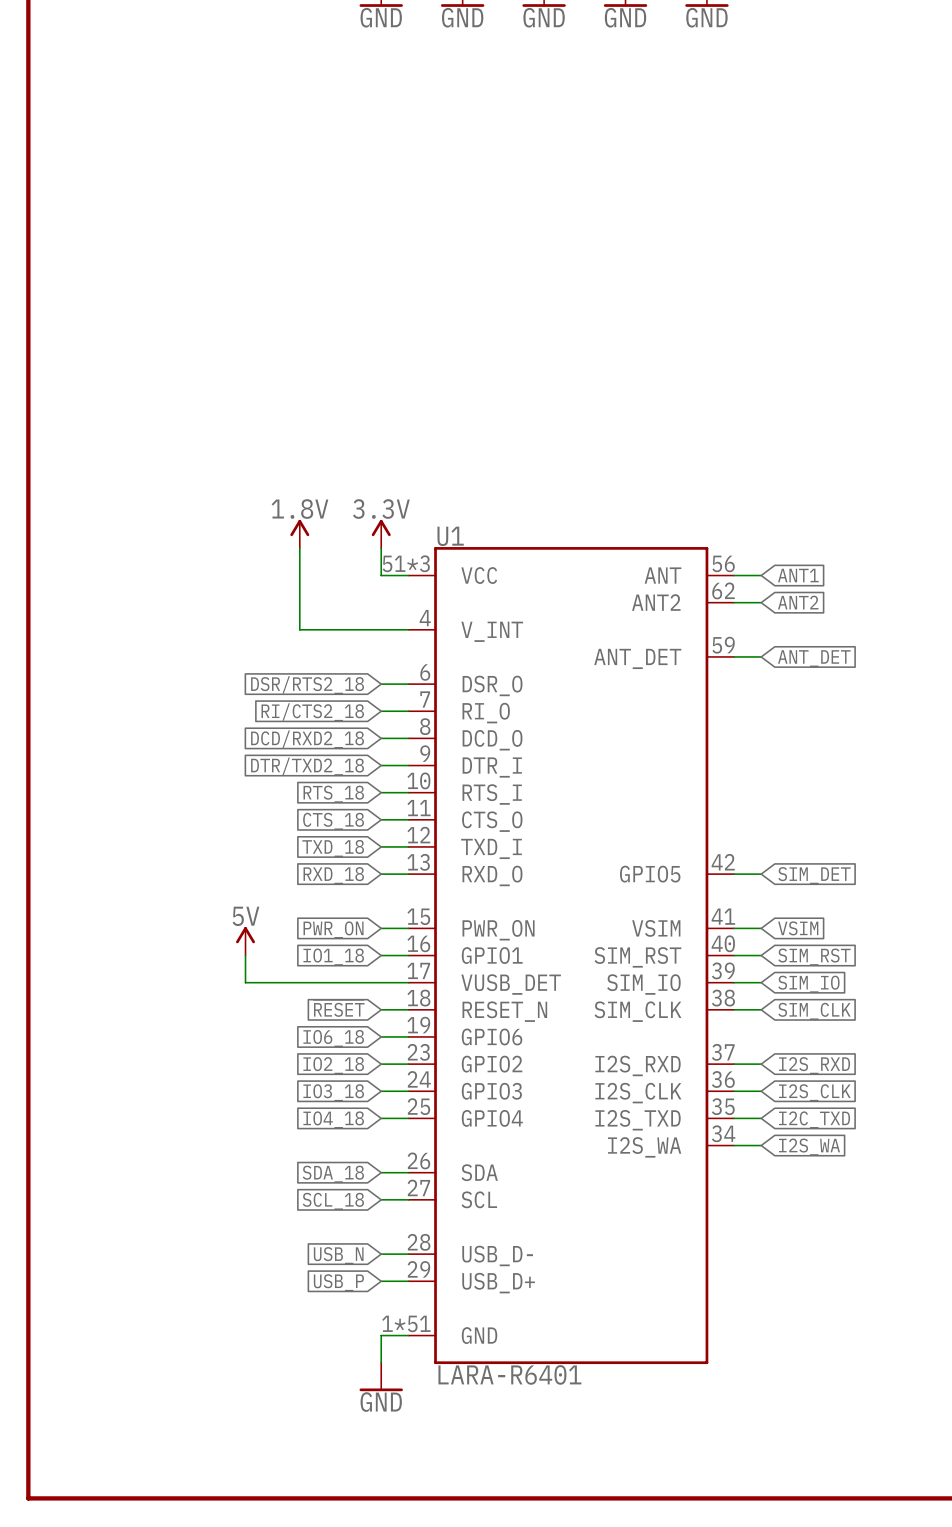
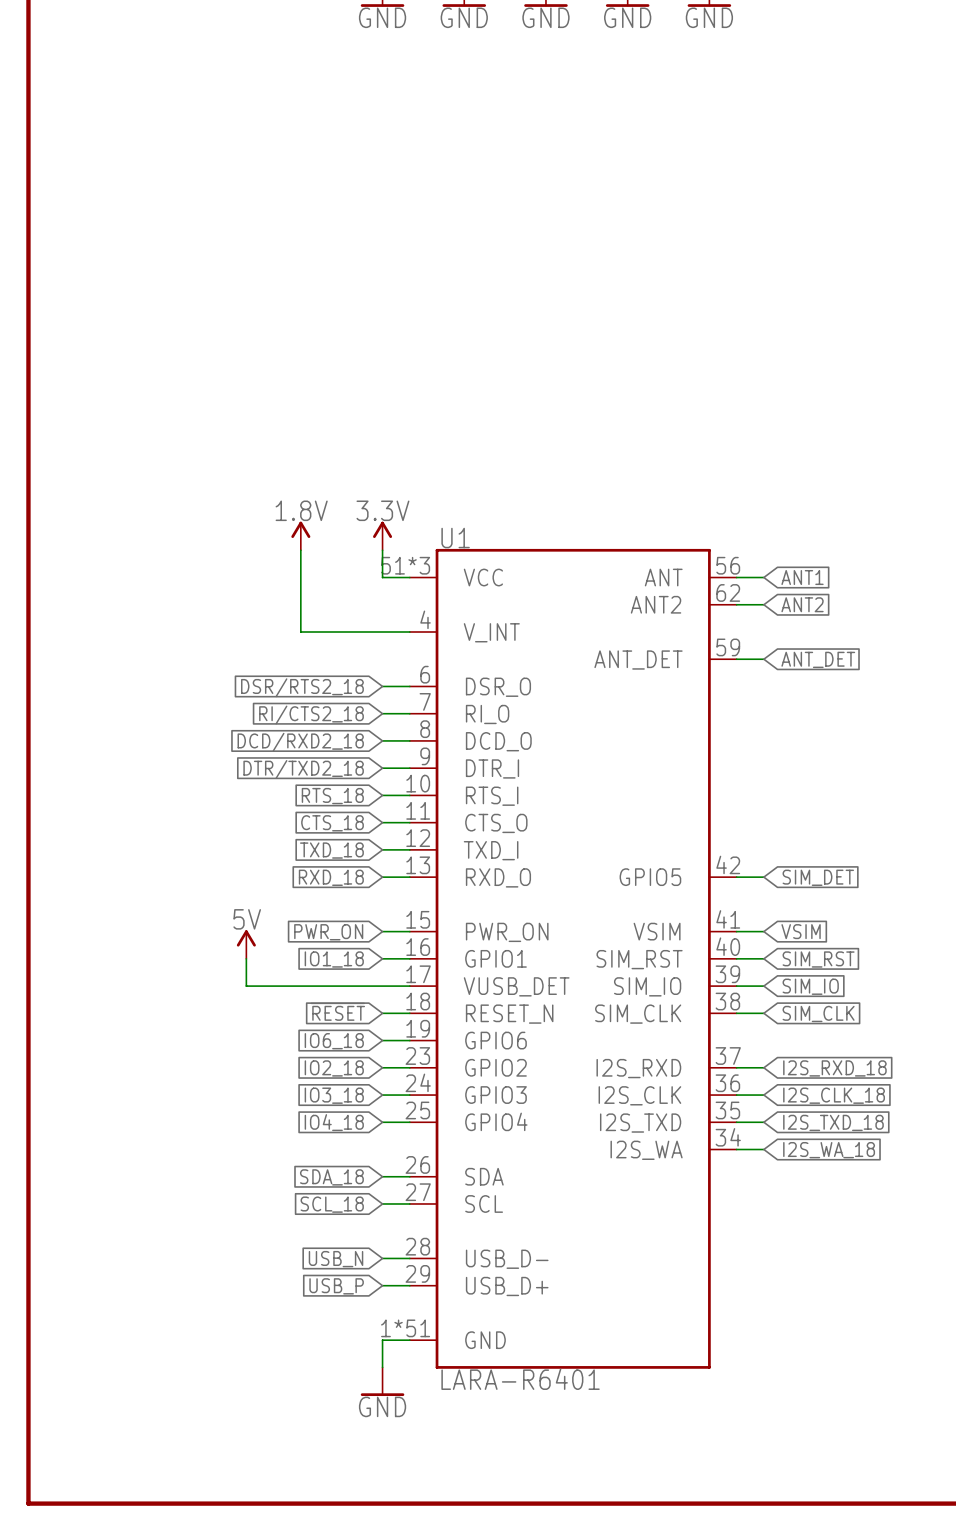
global label: I2S_RXD (814, 1065) -> I2S_RXD_18 (834, 1068)
global label: I2S_CLK (814, 1092) -> I2S_CLK_18 (834, 1095)
global label: I2C_TXD (814, 1119) -> I2S_TXD_18 (833, 1122)
global label: I2S_WA (809, 1147) -> I2S_WA_18 (829, 1150)

